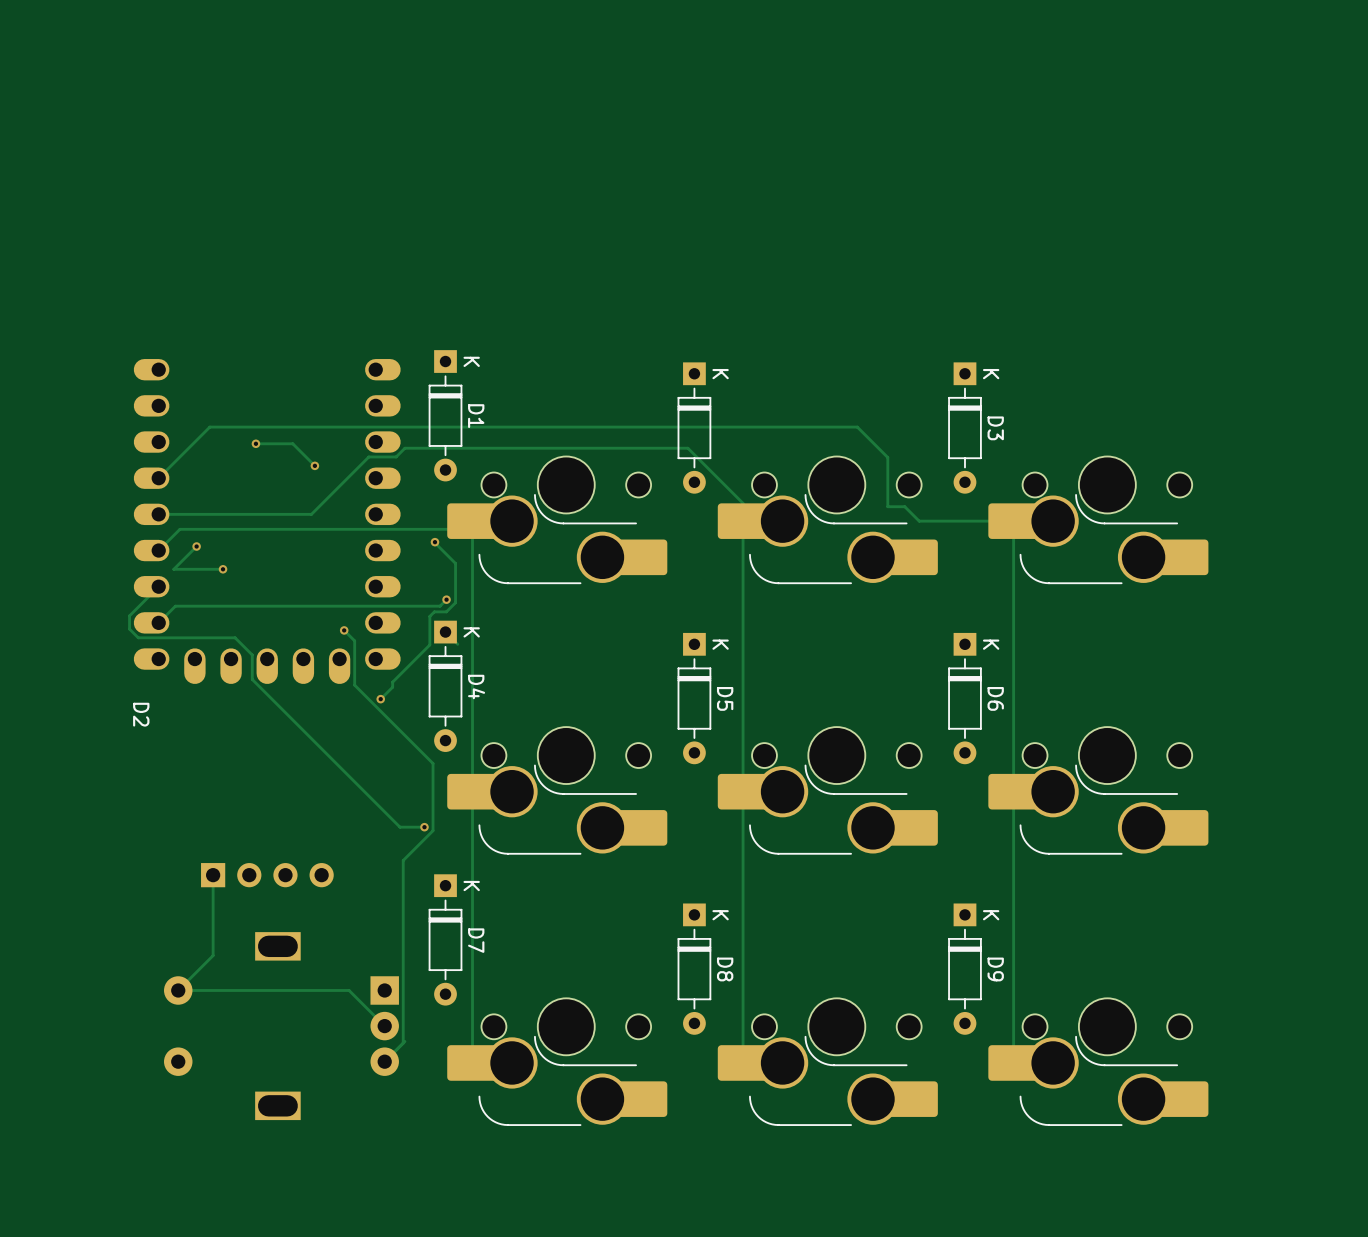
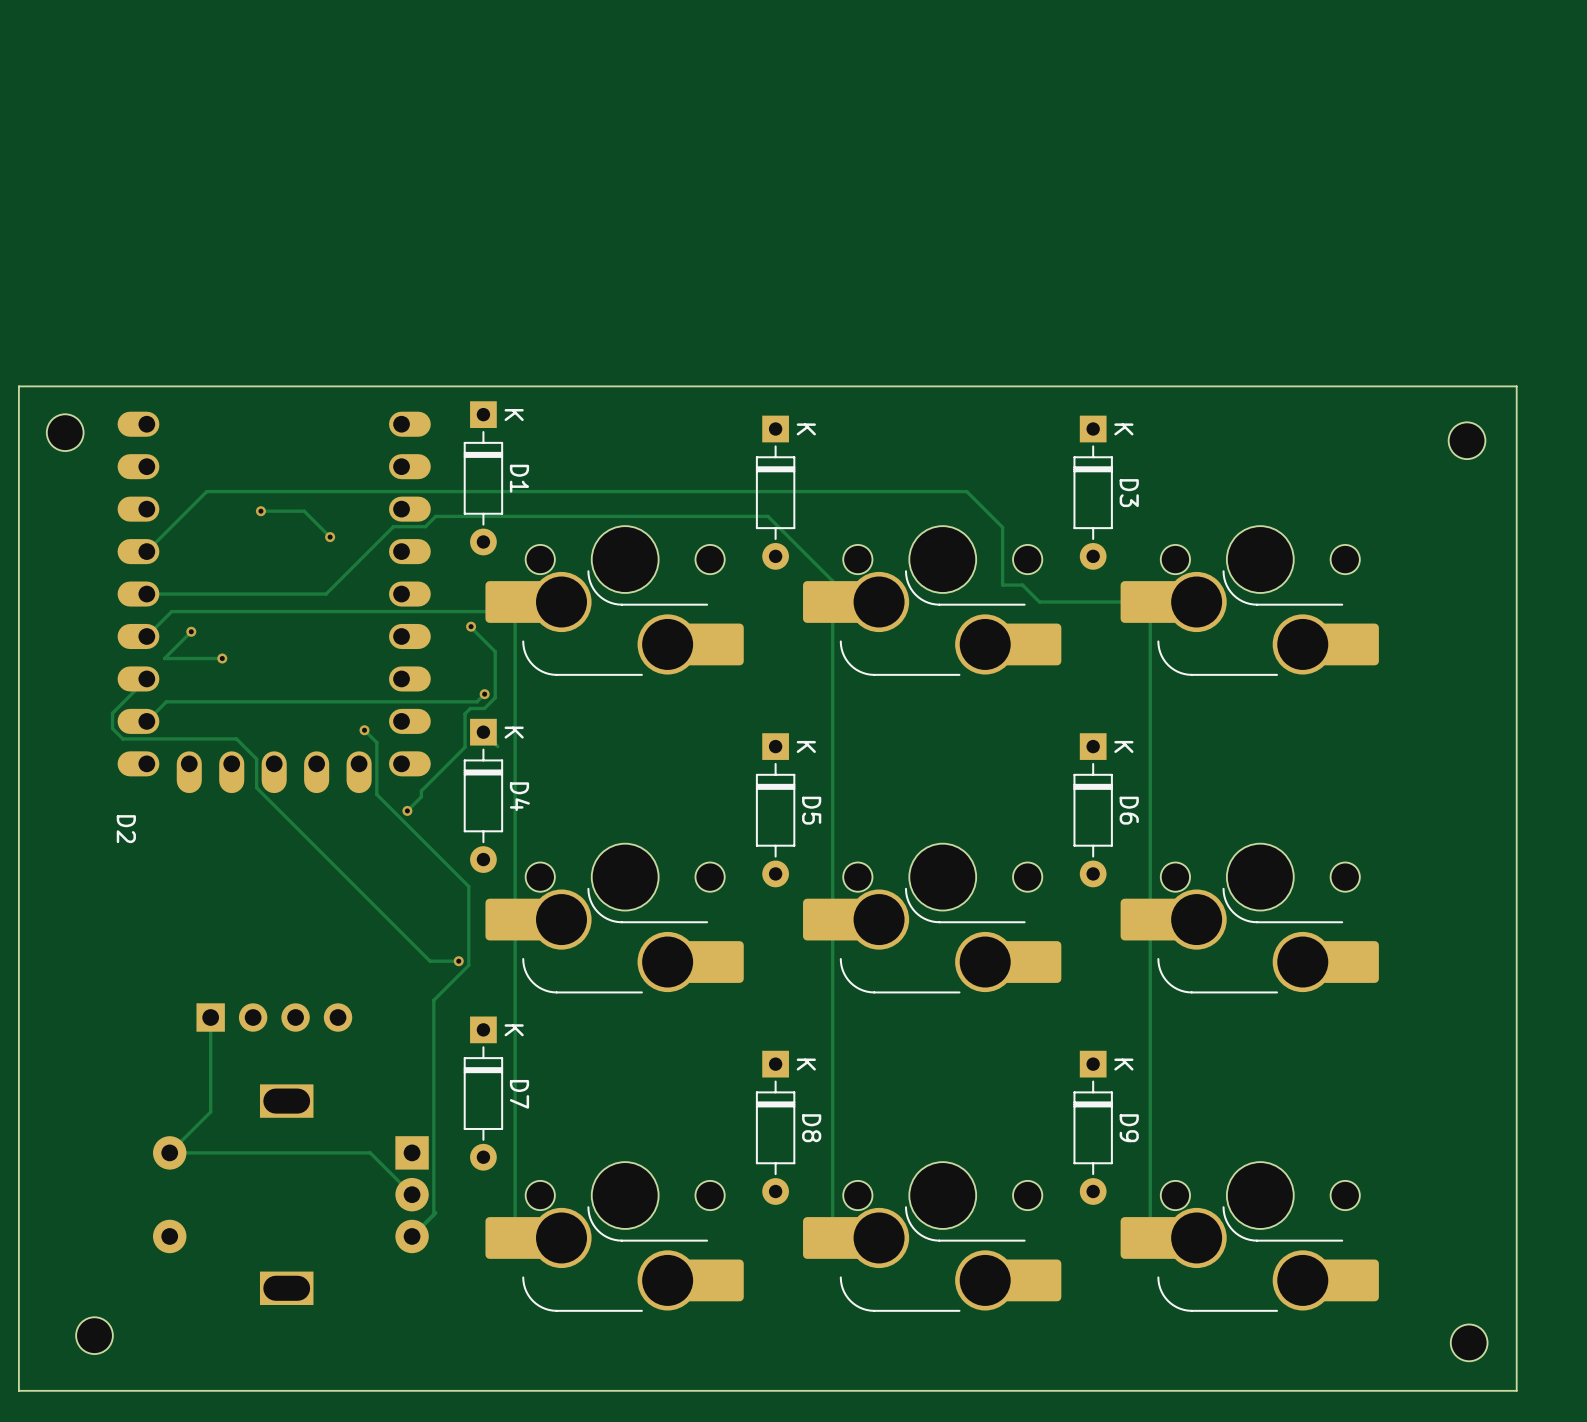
board edge: none -> (1516, 386) (18, 386) (18, 1390) (1516, 1390) (1516, 386)
part: none -> (65, 432)
part: none -> (1467, 440)
part: none -> (94, 1335)
part: none -> (1469, 1342)

